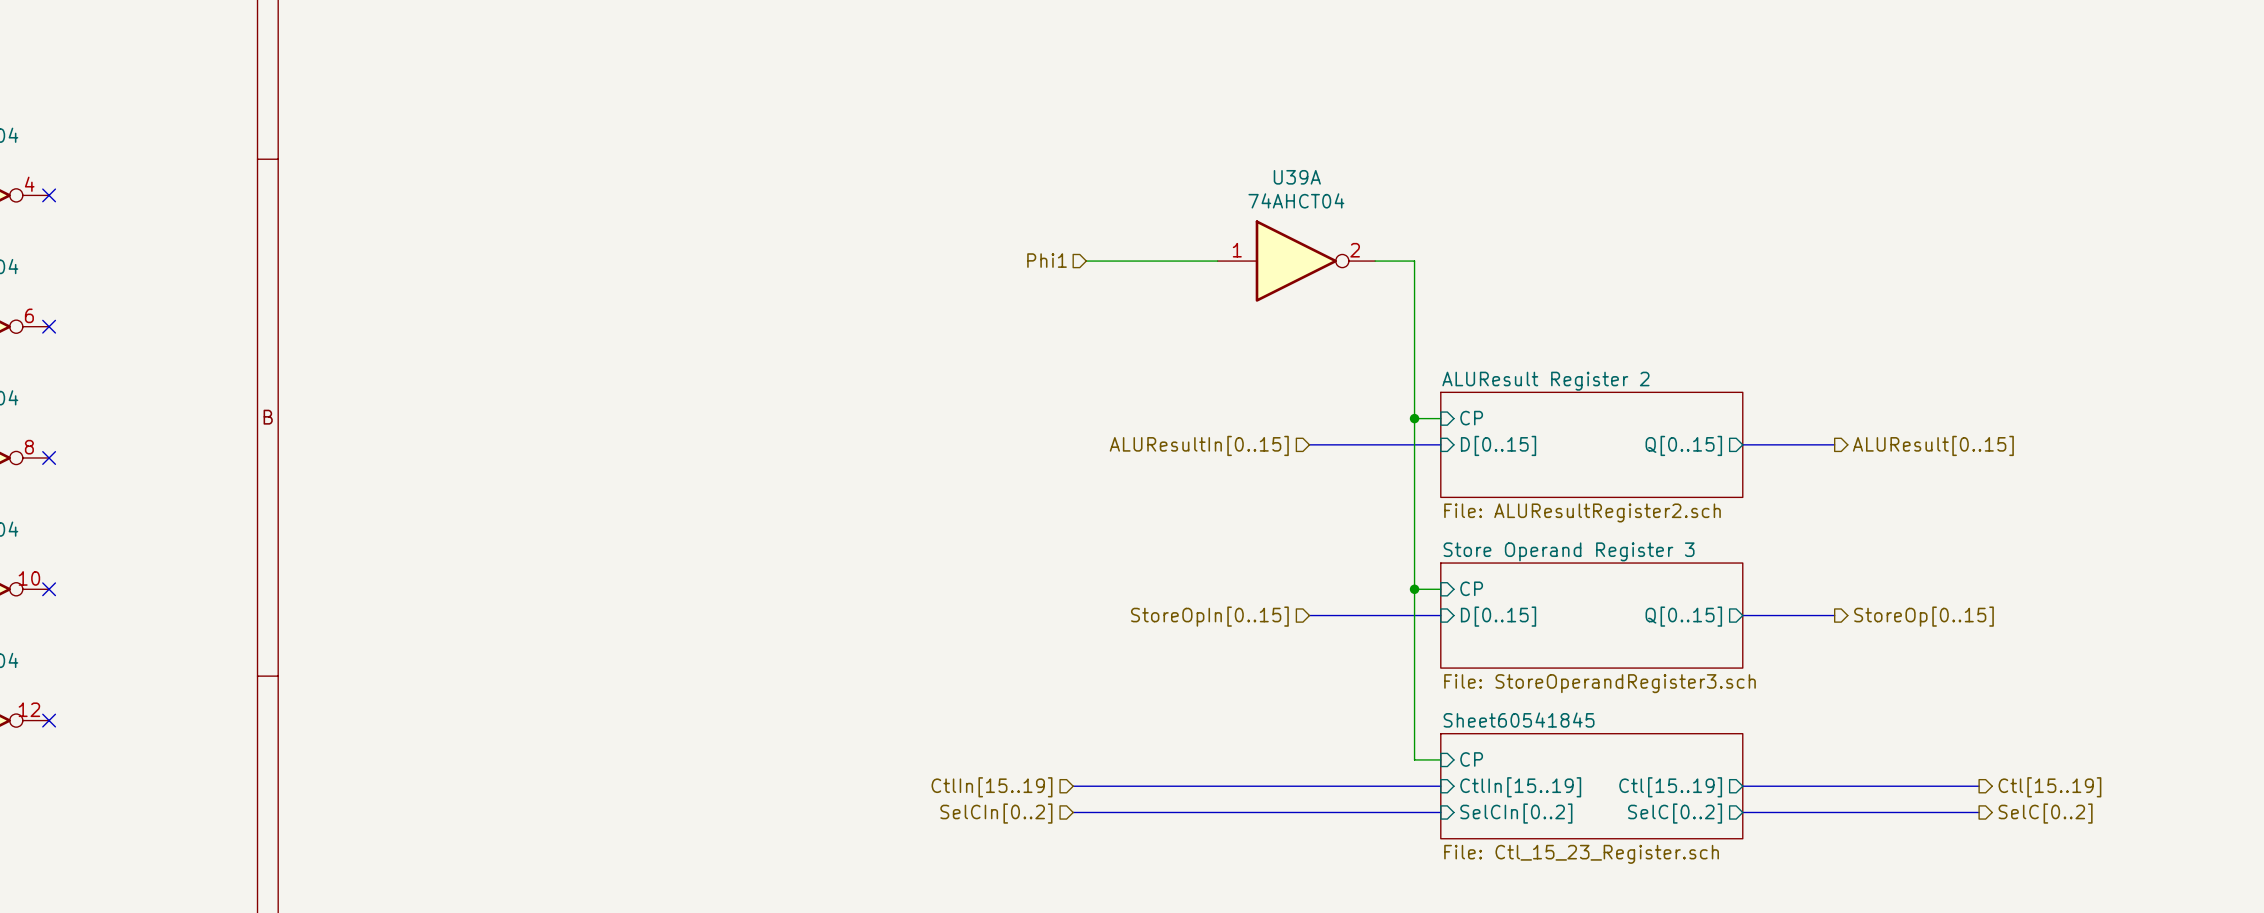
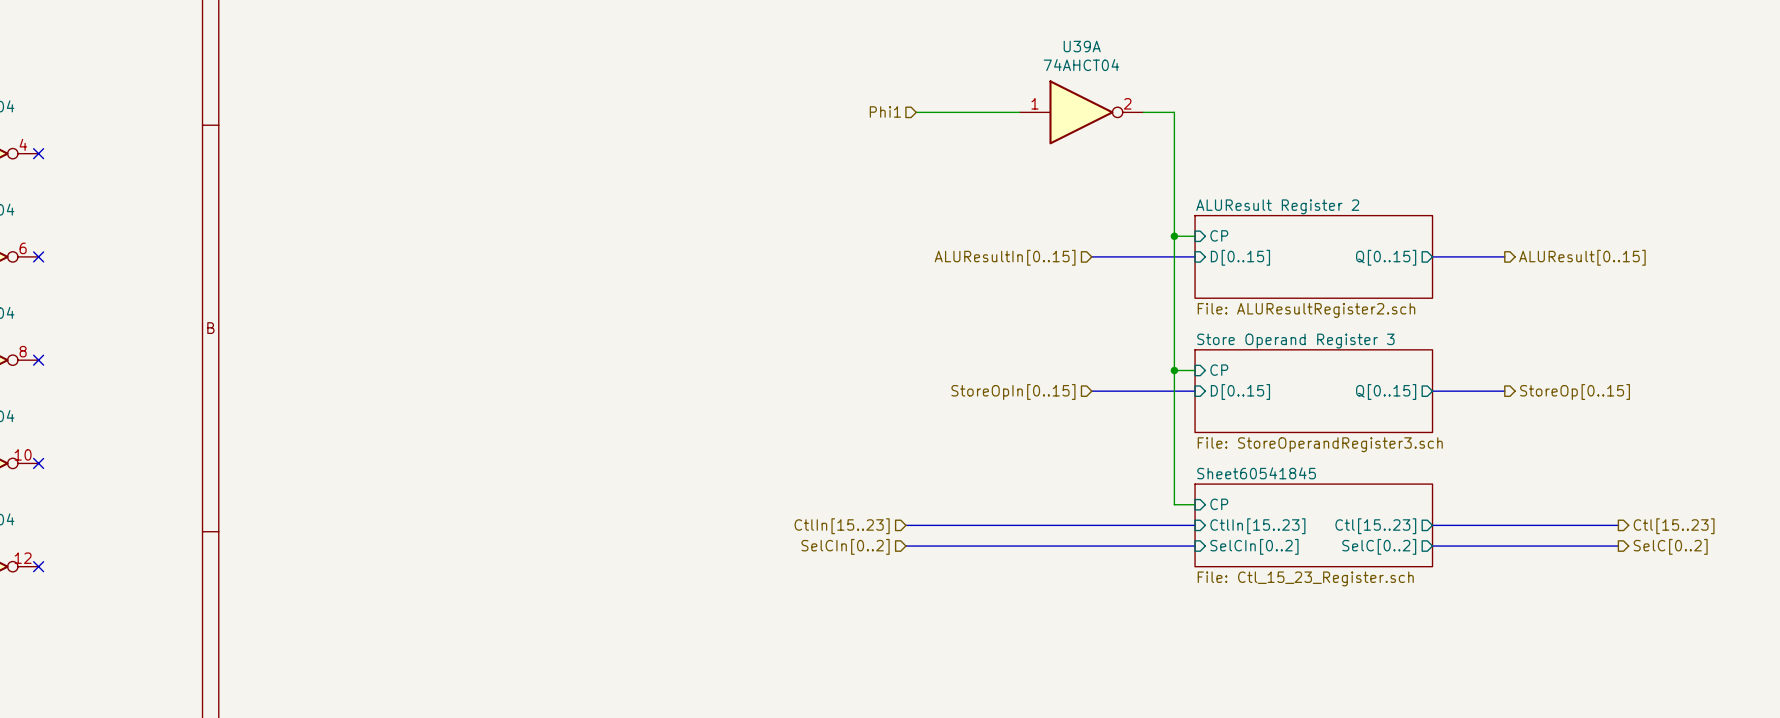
hierarchical label position: Phi1 (1047, 260) -> Phi1 (885, 111)
wire: (1086, 261) (1217, 261) -> (916, 112) (1019, 112)
U39A position: (1296, 261) -> (1081, 112)
wire: (1375, 261) (1414, 261) (1414, 759) (1440, 759) -> (1143, 112) (1174, 112) (1174, 504) (1195, 504)
sheet pin: none -> CP (1219, 235)
junction: none -> (1174, 236)
sheet pin: none -> D[0..15] (1240, 257)
sheet pin: none -> Q[0..15] (1386, 257)
wire: (1414, 418) (1440, 418) -> (1174, 236) (1195, 236)
junction: (1414, 418) -> none
sheet pin: CP (1471, 418) -> none
bus: (1309, 444) (1440, 444) -> (1091, 256) (1195, 256)
sheet ALUResult Register 2 position: (1591, 444) -> (1313, 256)
bus: (1742, 444) (1834, 444) -> (1432, 256) (1504, 256)
hierarchical label position: ALUResultIn[0..15] (1199, 445) -> ALUResultIn[0..15] (1005, 257)
sheet pin: D[0..15] (1498, 445) -> none
sheet pin: Q[0..15] (1683, 445) -> none
hierarchical label position: ALUResult[0..15] (1933, 445) -> ALUResult[0..15] (1582, 257)
sheet pin: none -> CP (1219, 370)
junction: none -> (1174, 370)
sheet pin: none -> D[0..15] (1240, 391)
sheet pin: none -> Q[0..15] (1386, 391)
sheet pin: CP (1471, 588) -> none
wire: (1414, 589) (1440, 589) -> (1174, 370) (1195, 370)
junction: (1414, 589) -> none
bus: (1309, 615) (1440, 615) -> (1091, 391) (1195, 391)
sheet Store Operand Register 3 position: (1591, 615) -> (1313, 391)
bus: (1742, 615) (1834, 615) -> (1432, 391) (1504, 391)
hierarchical label position: StoreOpIn[0..15] (1209, 616) -> StoreOpIn[0..15] (1013, 391)
sheet pin: D[0..15] (1498, 616) -> none
sheet pin: Q[0..15] (1683, 616) -> none
hierarchical label position: StoreOp[0..15] (1923, 616) -> StoreOp[0..15] (1575, 391)
sheet pin: none -> CP (1219, 504)
hierarchical label: none -> CtlIn[15..23] (842, 526)
sheet pin: none -> CtlIn[15..23] (1257, 526)
sheet pin: none -> Ctl[15..23] (1375, 526)
hierarchical label: none -> Ctl[15..23] (1674, 526)
sheet pin: CP (1471, 759) -> none
bus: (1073, 786) (1440, 786) -> (905, 525) (1195, 525)
sheet Sheet60541845 position: (1591, 786) -> (1313, 525)
bus: (1742, 786) (1979, 786) -> (1432, 525) (1618, 525)
hierarchical label: CtlIn[15..19] (992, 787) -> none
sheet pin: CtlIn[15..19] (1520, 787) -> none
sheet pin: Ctl[15..19] (1670, 787) -> none
hierarchical label: Ctl[15..19] (2049, 787) -> none
bus: (1073, 812) (1440, 812) -> (905, 546) (1195, 546)
bus: (1742, 812) (1979, 812) -> (1432, 546) (1618, 546)
hierarchical label position: SelCIn[0..2] (996, 813) -> SelCIn[0..2] (845, 546)
sheet pin position: SelCIn[0..2] (1516, 813) -> SelCIn[0..2] (1254, 546)
sheet pin position: SelC[0..2] (1675, 813) -> SelC[0..2] (1379, 546)
hierarchical label position: SelC[0..2] (2045, 813) -> SelC[0..2] (1670, 546)

